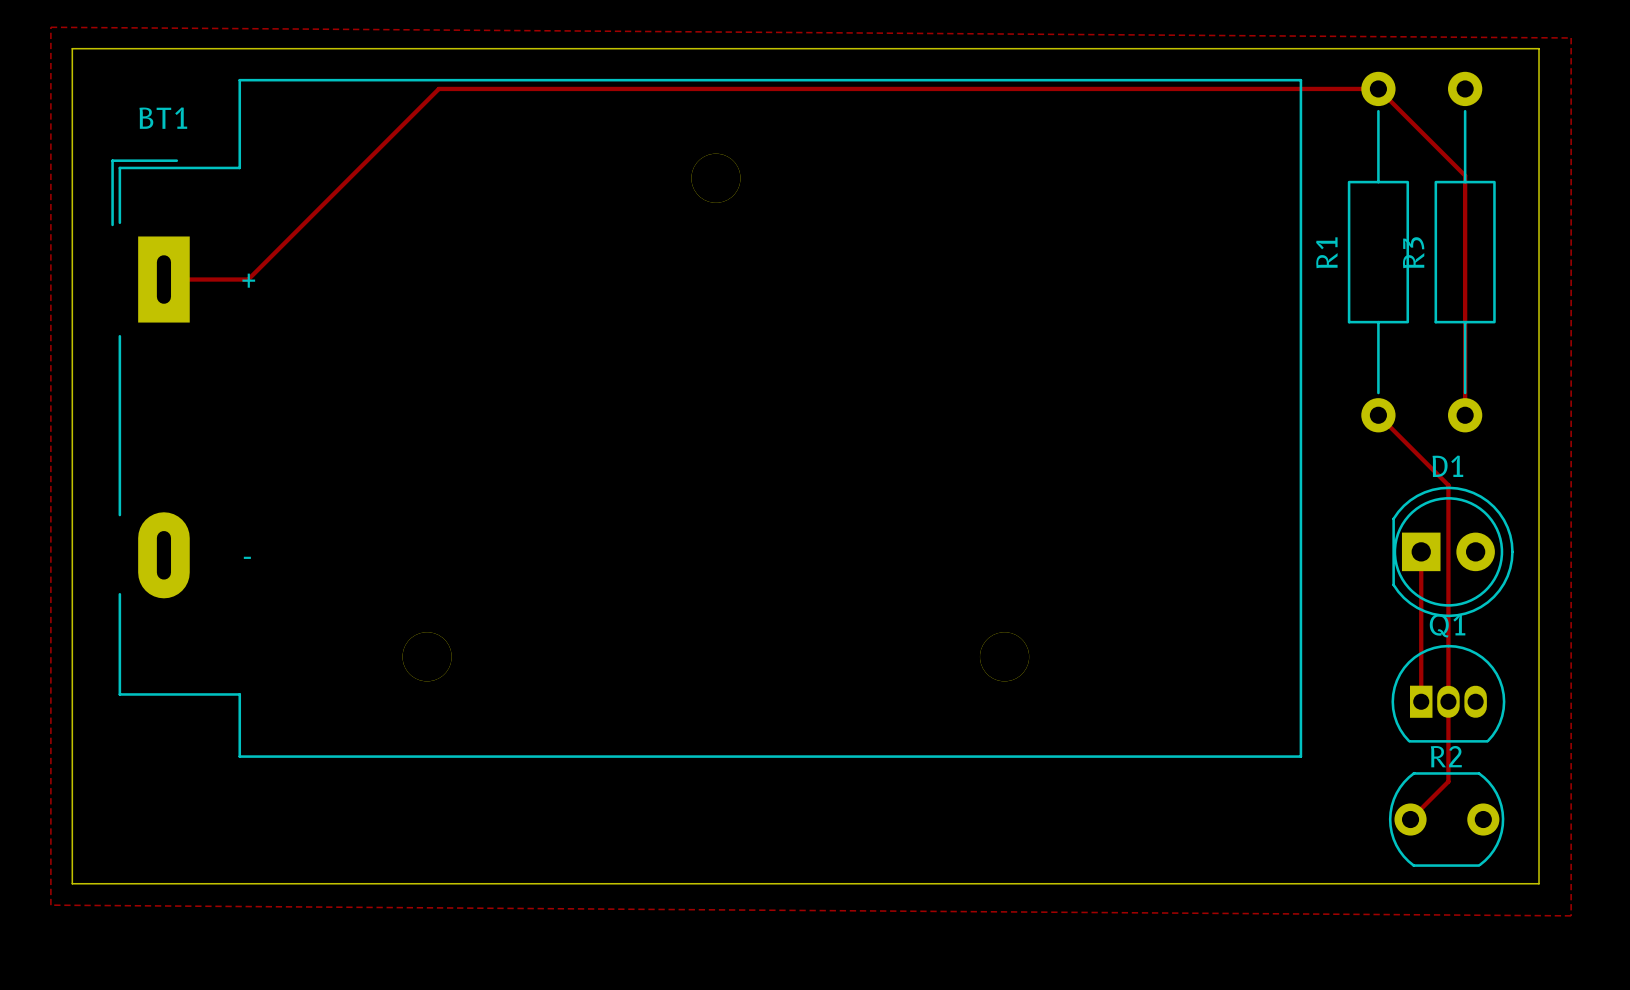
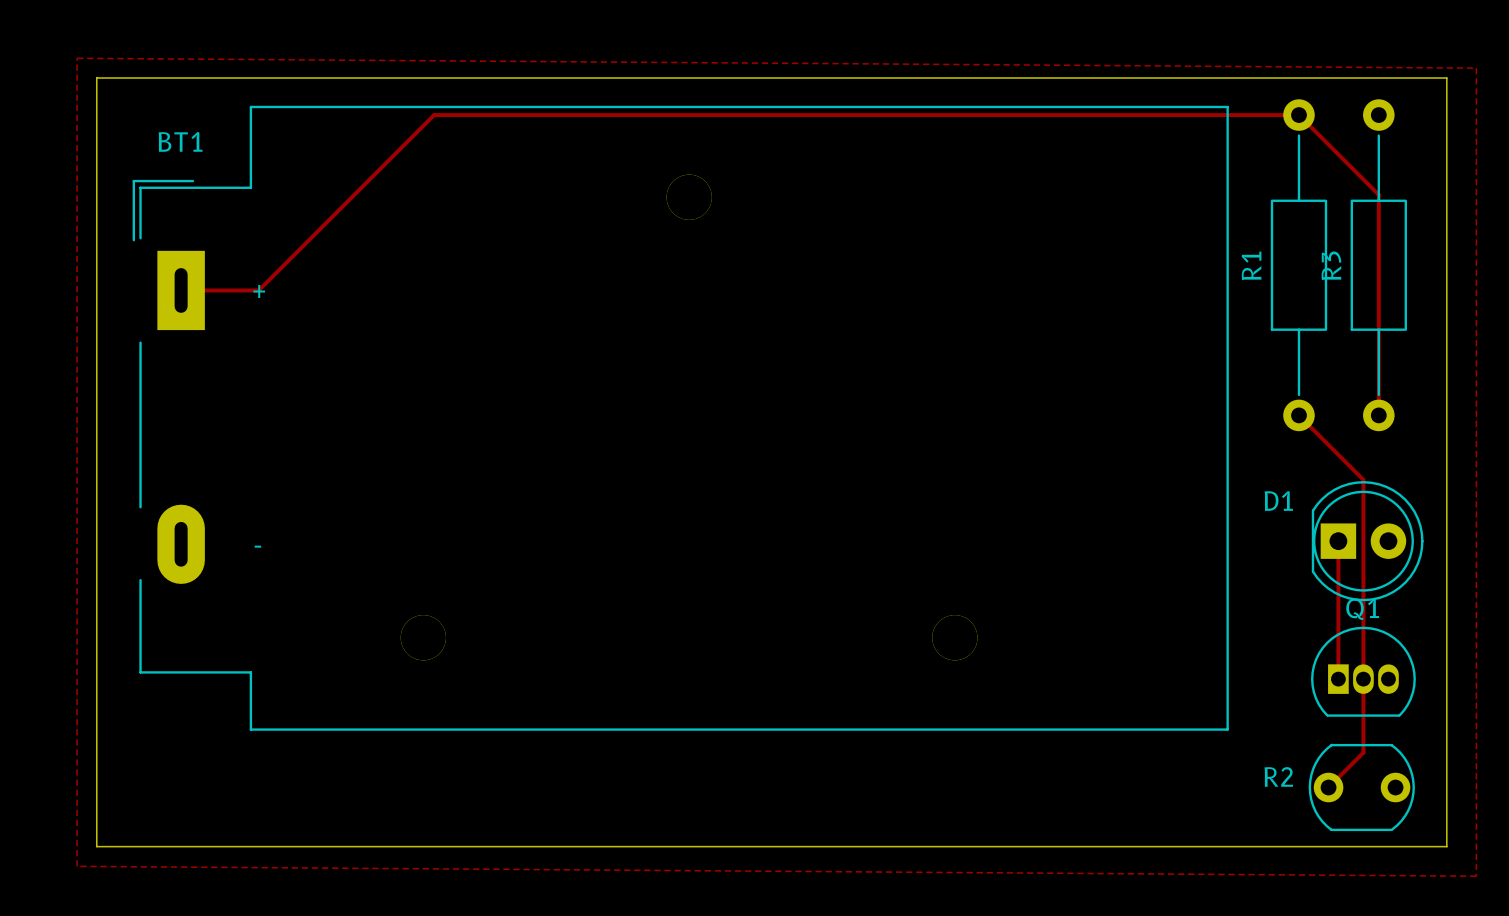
D1 name position: D1 (1447, 466) -> D1 (1278, 501)
R2 name position: R2 (1446, 756) -> R2 (1278, 776)

